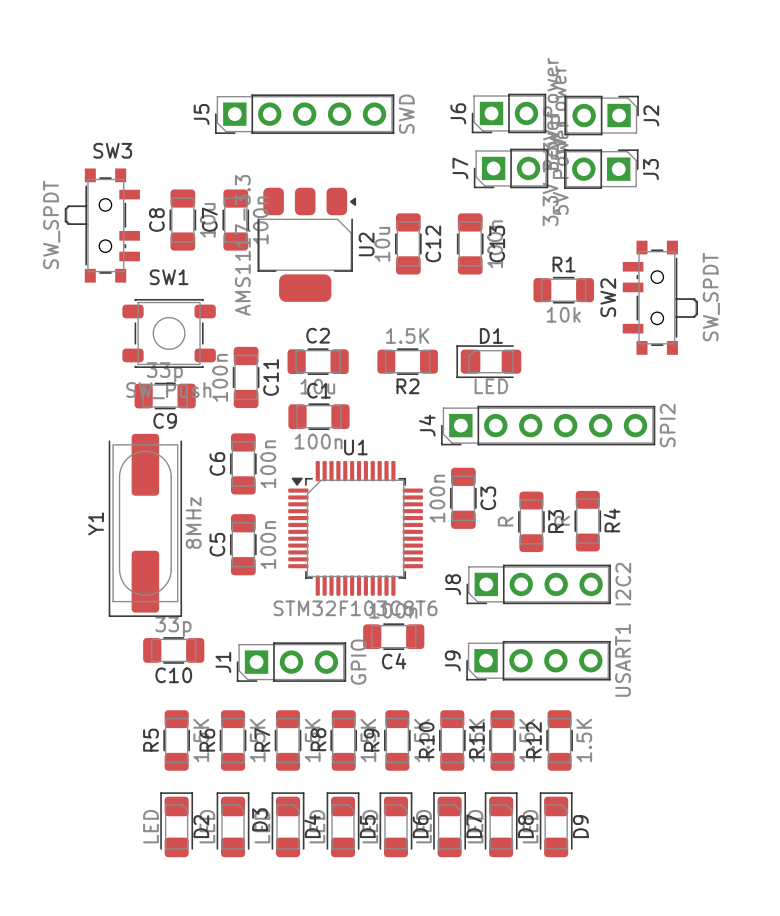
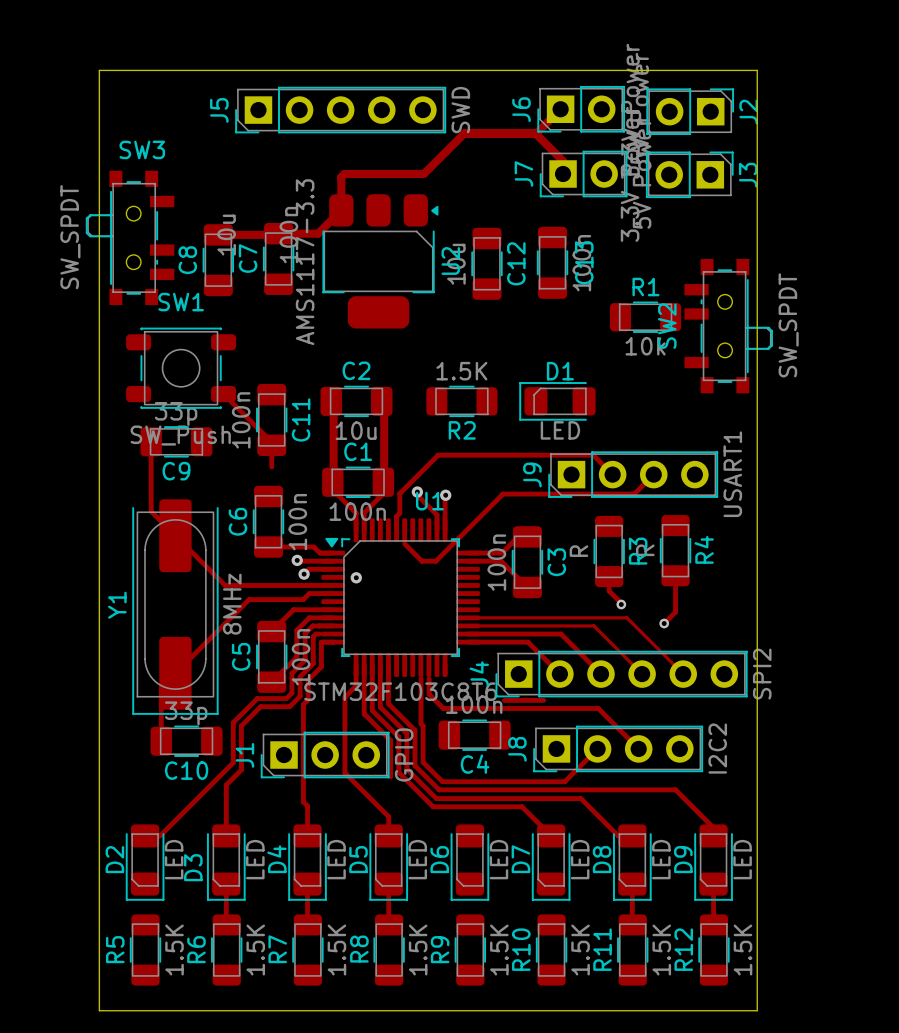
board edge: none -> (99, 70) (757, 70) (757, 1010) (99, 1010) (99, 70)
track: none -> (560, 109) (536, 133) (464, 133) (423, 173) (344, 173) (341, 177) (341, 210) (318, 233) (218, 234)
track: none -> (535, 133) (563, 161) (563, 173)
C8 position: (182, 220) -> (218, 260)
C7 position: (235, 220) -> (278, 258)
SW3 position: (102, 225) -> (130, 237)
C12 position: (408, 243) -> (486, 263)
C13 position: (470, 243) -> (552, 262)
U2 position: (306, 244) -> (380, 261)
SW2 position: (660, 297) -> (728, 326)
track: none -> (223, 394) (271, 442) (271, 466)
track: none -> (333, 399) (332, 489) (356, 513) (356, 530)
track: none -> (384, 399) (383, 493) (364, 512) (364, 530)
track: none -> (151, 441) (151, 511) (225, 585) (333, 585)
C1 position: (318, 416) -> (358, 482)
track: none -> (612, 474) (593, 455) (438, 455) (399, 493) (399, 513) (396, 516) (396, 530)
track: none -> (653, 474) (634, 494) (503, 494) (435, 561) (421, 561) (404, 543)
J4 position: (548, 425) -> (621, 674)
track: none -> (417, 492) (417, 495) (437, 514) (437, 530)
via: none -> (417, 492)
track: none -> (445, 495) (445, 530)
via: none -> (445, 495)
U1 name position: U1 (355, 447) -> U1 (429, 501)
track: none -> (527, 536) (518, 536) (501, 553) (467, 553)
track: none -> (268, 547) (313, 547) (319, 553) (333, 553)
track: none -> (297, 560) (333, 561)
via: none -> (297, 560)
track: none -> (467, 561) (501, 561) (527, 587)
track: none -> (333, 569) (308, 569) (304, 574)
via: none -> (304, 574)
track: none -> (675, 575) (675, 612) (664, 623)
track: none -> (609, 576) (609, 591) (621, 604)
via: none -> (356, 577)
R3 position: (531, 521) -> (609, 551)
R4 position: (587, 521) -> (675, 550)
track: none -> (333, 593) (309, 593) (303, 599) (249, 599) (161, 687) (161, 741)
Y1 position: (145, 525) -> (175, 607)
via: none -> (621, 604)
track: none -> (333, 609) (293, 609) (271, 631)
C5 position: (243, 544) -> (271, 656)
track: none -> (333, 617) (309, 617) (296, 630) (296, 657) (271, 682)
track: none -> (467, 617) (626, 617) (683, 674)
via: none -> (664, 623)
track: none -> (333, 625) (312, 625) (305, 633) (304, 660) (291, 673) (291, 692) (286, 698) (257, 698)
track: none -> (467, 625) (593, 625) (642, 674)
track: none -> (319, 634) (313, 636) (313, 663) (300, 676) (300, 696) (289, 706) (260, 706) (241, 725) (241, 769) (226, 785) (226, 835)
track: none -> (467, 634) (560, 634) (601, 674)
track: none -> (333, 642) (321, 642) (321, 666) (308, 680) (308, 699) (303, 704) (303, 801) (307, 805) (307, 835)
track: none -> (467, 642) (527, 642) (559, 674)
J8 position: (538, 584) -> (618, 748)
track: none -> (356, 664) (356, 686) (344, 697) (344, 773) (388, 816) (388, 835)
track: none -> (364, 664) (364, 713) (390, 740) (390, 776)
track: none -> (372, 664) (372, 710) (398, 737) (398, 772) (433, 806) (522, 806) (551, 835)
track: none -> (380, 664) (380, 707) (406, 733) (406, 769) (436, 798) (580, 798) (618, 835) (632, 835)
track: none -> (388, 664) (388, 703) (415, 730) (415, 765) (439, 789) (675, 789) (713, 827) (713, 835)
track: none -> (421, 678) (423, 762) (442, 781) (564, 781) (597, 748)
track: none -> (429, 678) (429, 694) (443, 708) (598, 708) (638, 748)
track: none -> (257, 698) (233, 722) (233, 762) (160, 835) (145, 835)
track: none -> (504, 700) (543, 700)
C4 position: (393, 636) -> (474, 735)
J9 position: (538, 660) -> (633, 474)
R5 position: (176, 740) -> (145, 950)
R6 position: (233, 740) -> (226, 950)
R7 position: (288, 740) -> (307, 950)
R8 position: (343, 740) -> (389, 950)
R9 position: (397, 740) -> (470, 950)
R10 position: (452, 740) -> (551, 950)
R11 position: (502, 740) -> (632, 950)
R12 position: (559, 740) -> (713, 950)
track: none -> (226, 884) (226, 924)
track: none -> (307, 884) (307, 924)
track: none -> (388, 884) (389, 924)
track: none -> (632, 884) (632, 924)
track: none -> (713, 884) (713, 924)
D2 rotation: 0° (176, 824) -> 180° (145, 862)
D2 position: (176, 824) -> (145, 862)
D3 rotation: 0° (233, 824) -> 180° (226, 862)
D3 position: (233, 824) -> (226, 862)
D4 rotation: 0° (288, 824) -> 180° (307, 862)
D4 position: (288, 824) -> (307, 862)
D5 rotation: 0° (343, 824) -> 180° (388, 862)
D5 position: (343, 824) -> (388, 862)
D6 rotation: 0° (395, 824) -> 180° (469, 862)
D6 position: (395, 824) -> (469, 862)
D7 rotation: 0° (449, 824) -> 180° (551, 862)
D7 position: (449, 824) -> (551, 862)
D8 rotation: 0° (501, 824) -> 180° (632, 862)
D8 position: (501, 824) -> (632, 862)
D9 rotation: 0° (556, 824) -> 180° (713, 862)
D9 position: (556, 824) -> (713, 862)

